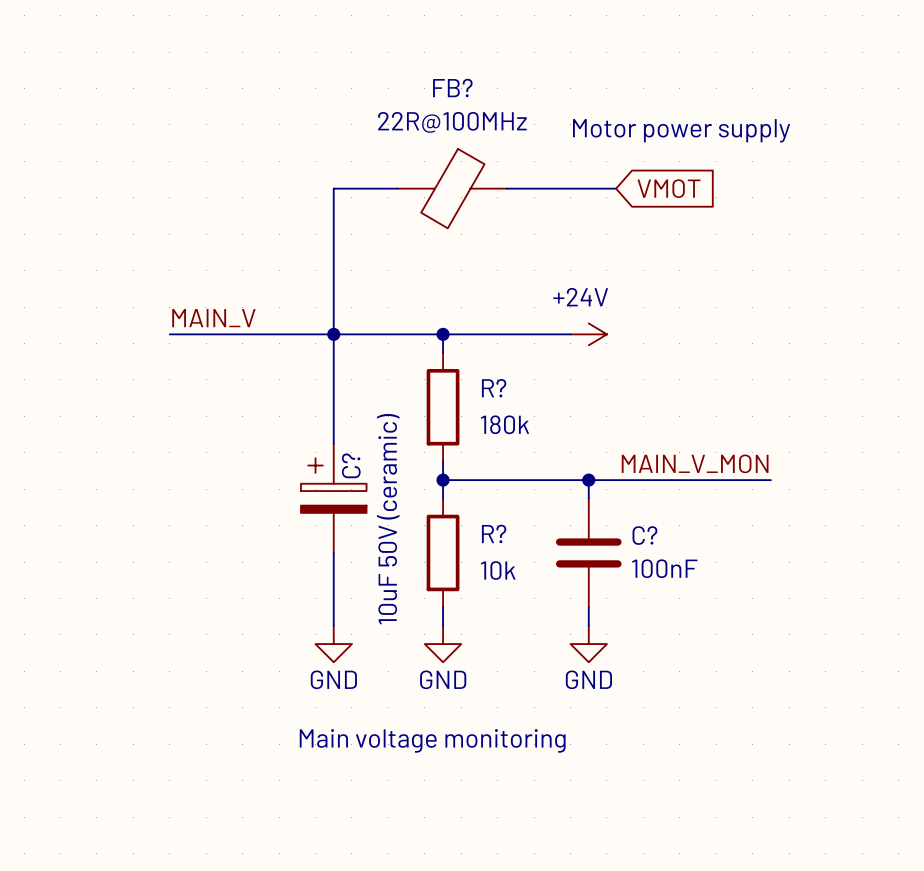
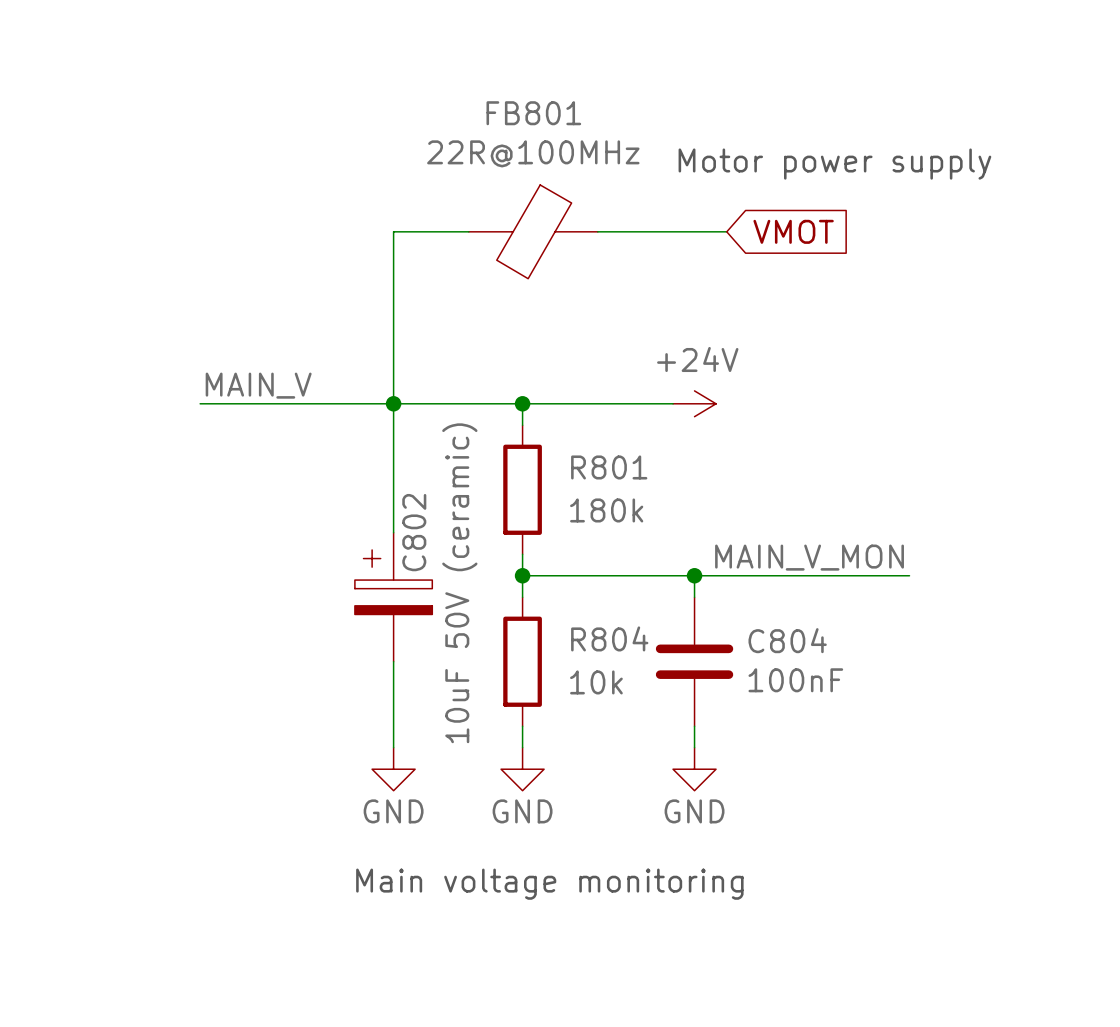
FB? name: FB? (452, 88) -> FB801 (533, 113)
R? name: R? (494, 388) -> R801 (609, 467)
C? name: C? (351, 465) -> C802 (414, 532)
R? name: R? (494, 533) -> R804 (609, 638)
C? name: C? (644, 535) -> C804 (787, 640)

